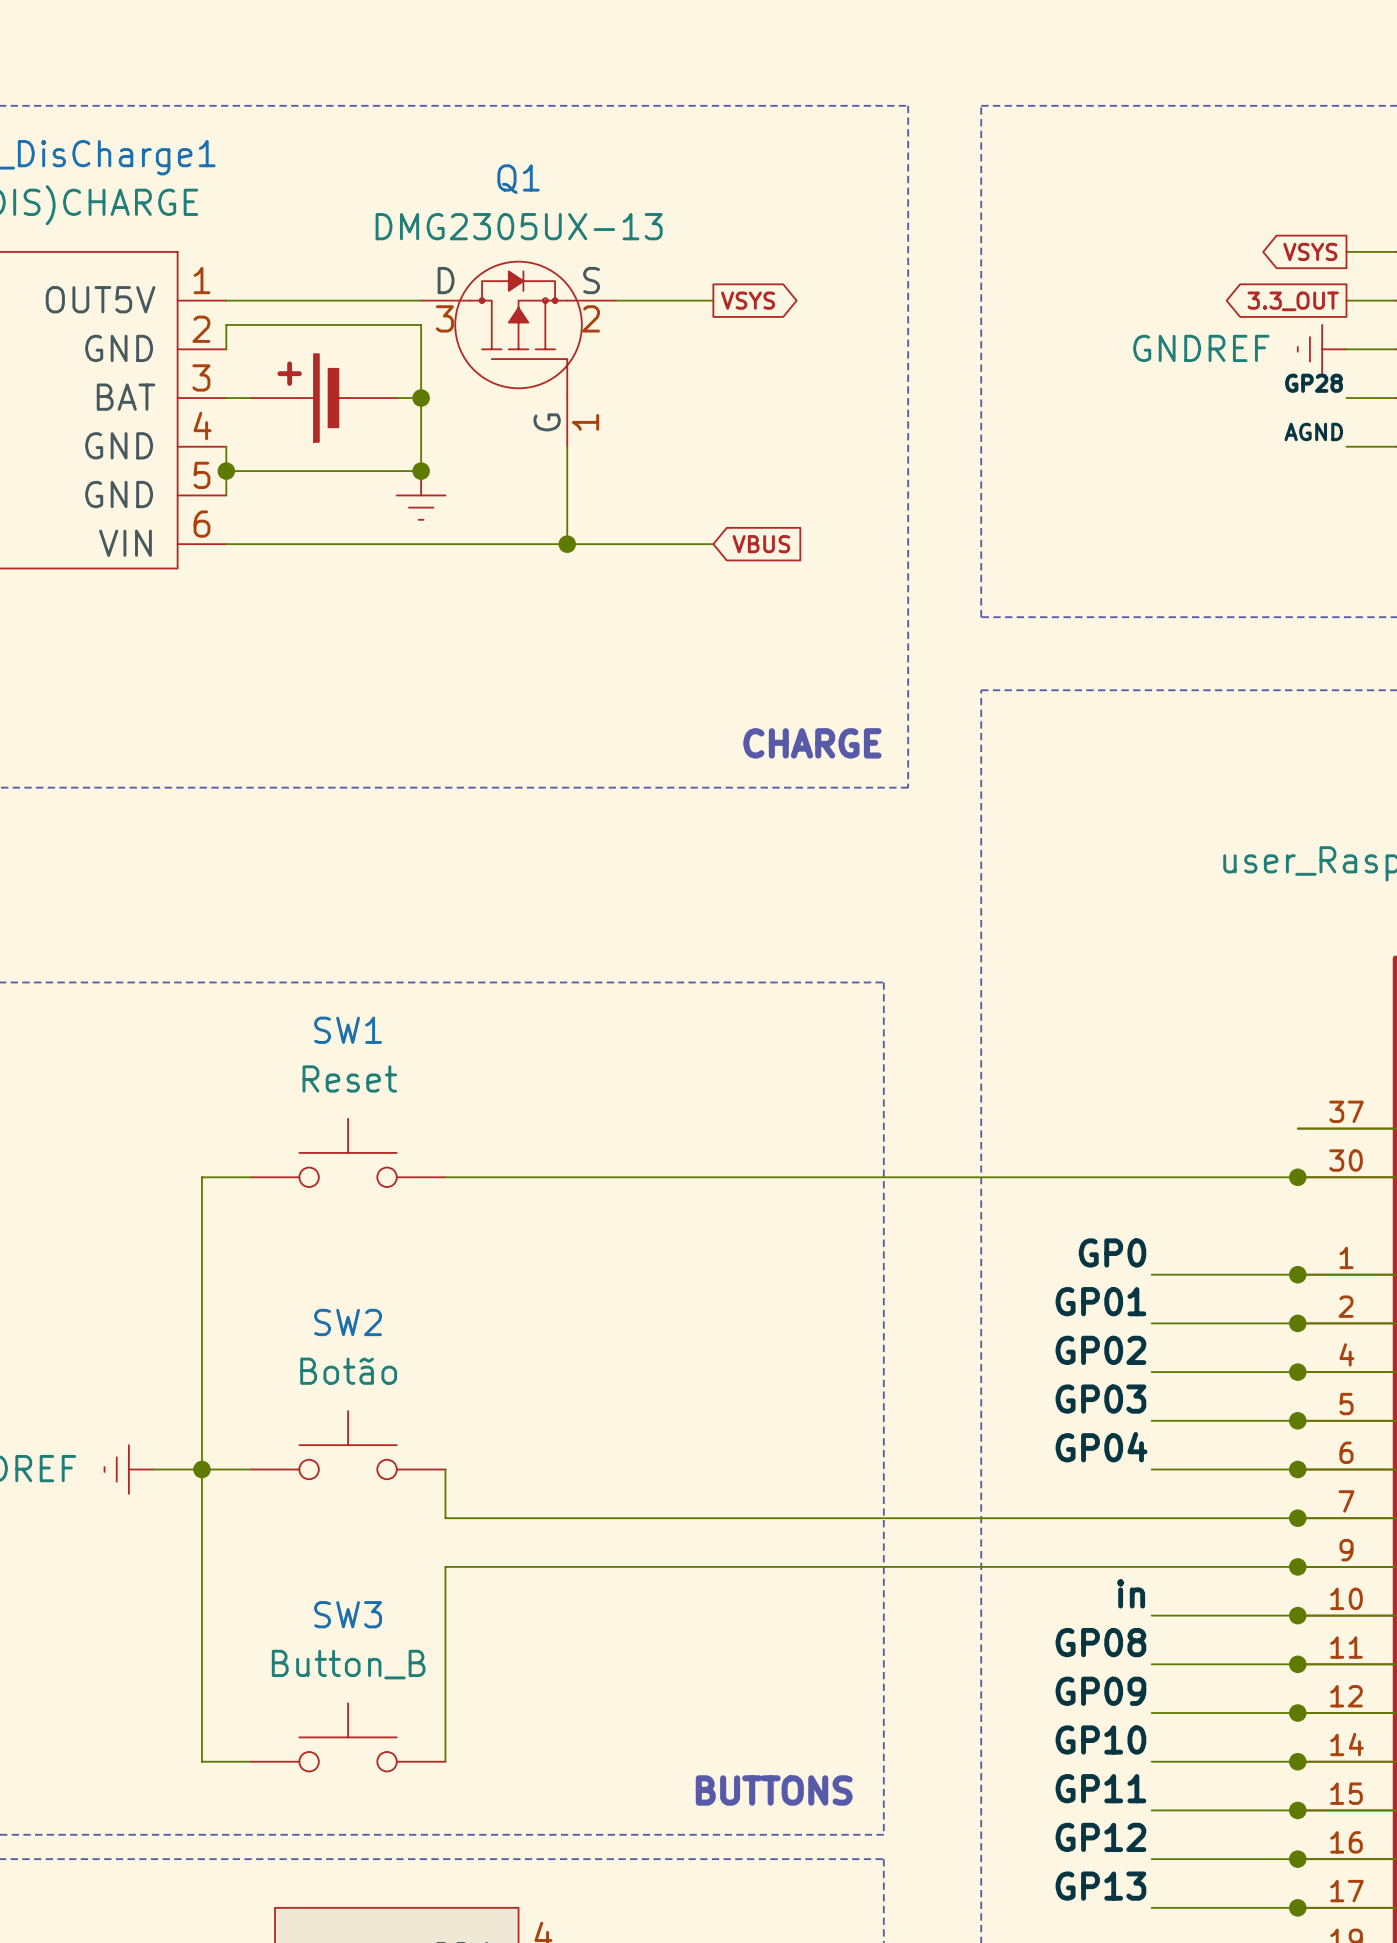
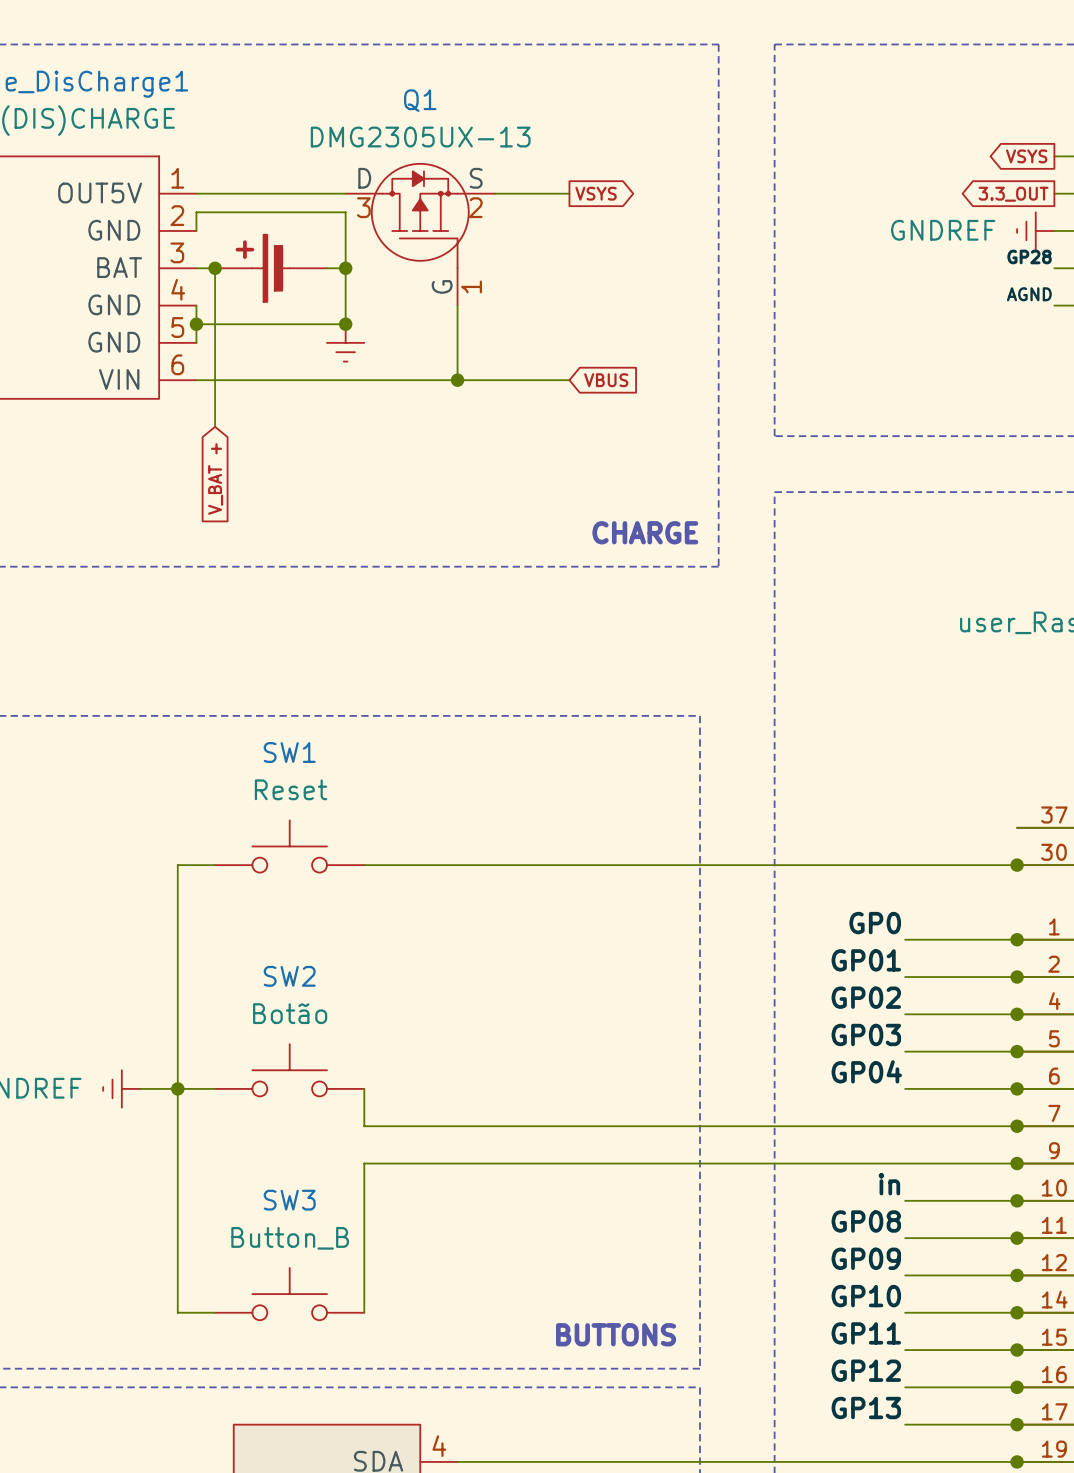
wire: none -> (215, 268) (215, 426)
junction: none -> (215, 268)
global label: none -> V_BAT + (215, 478)

